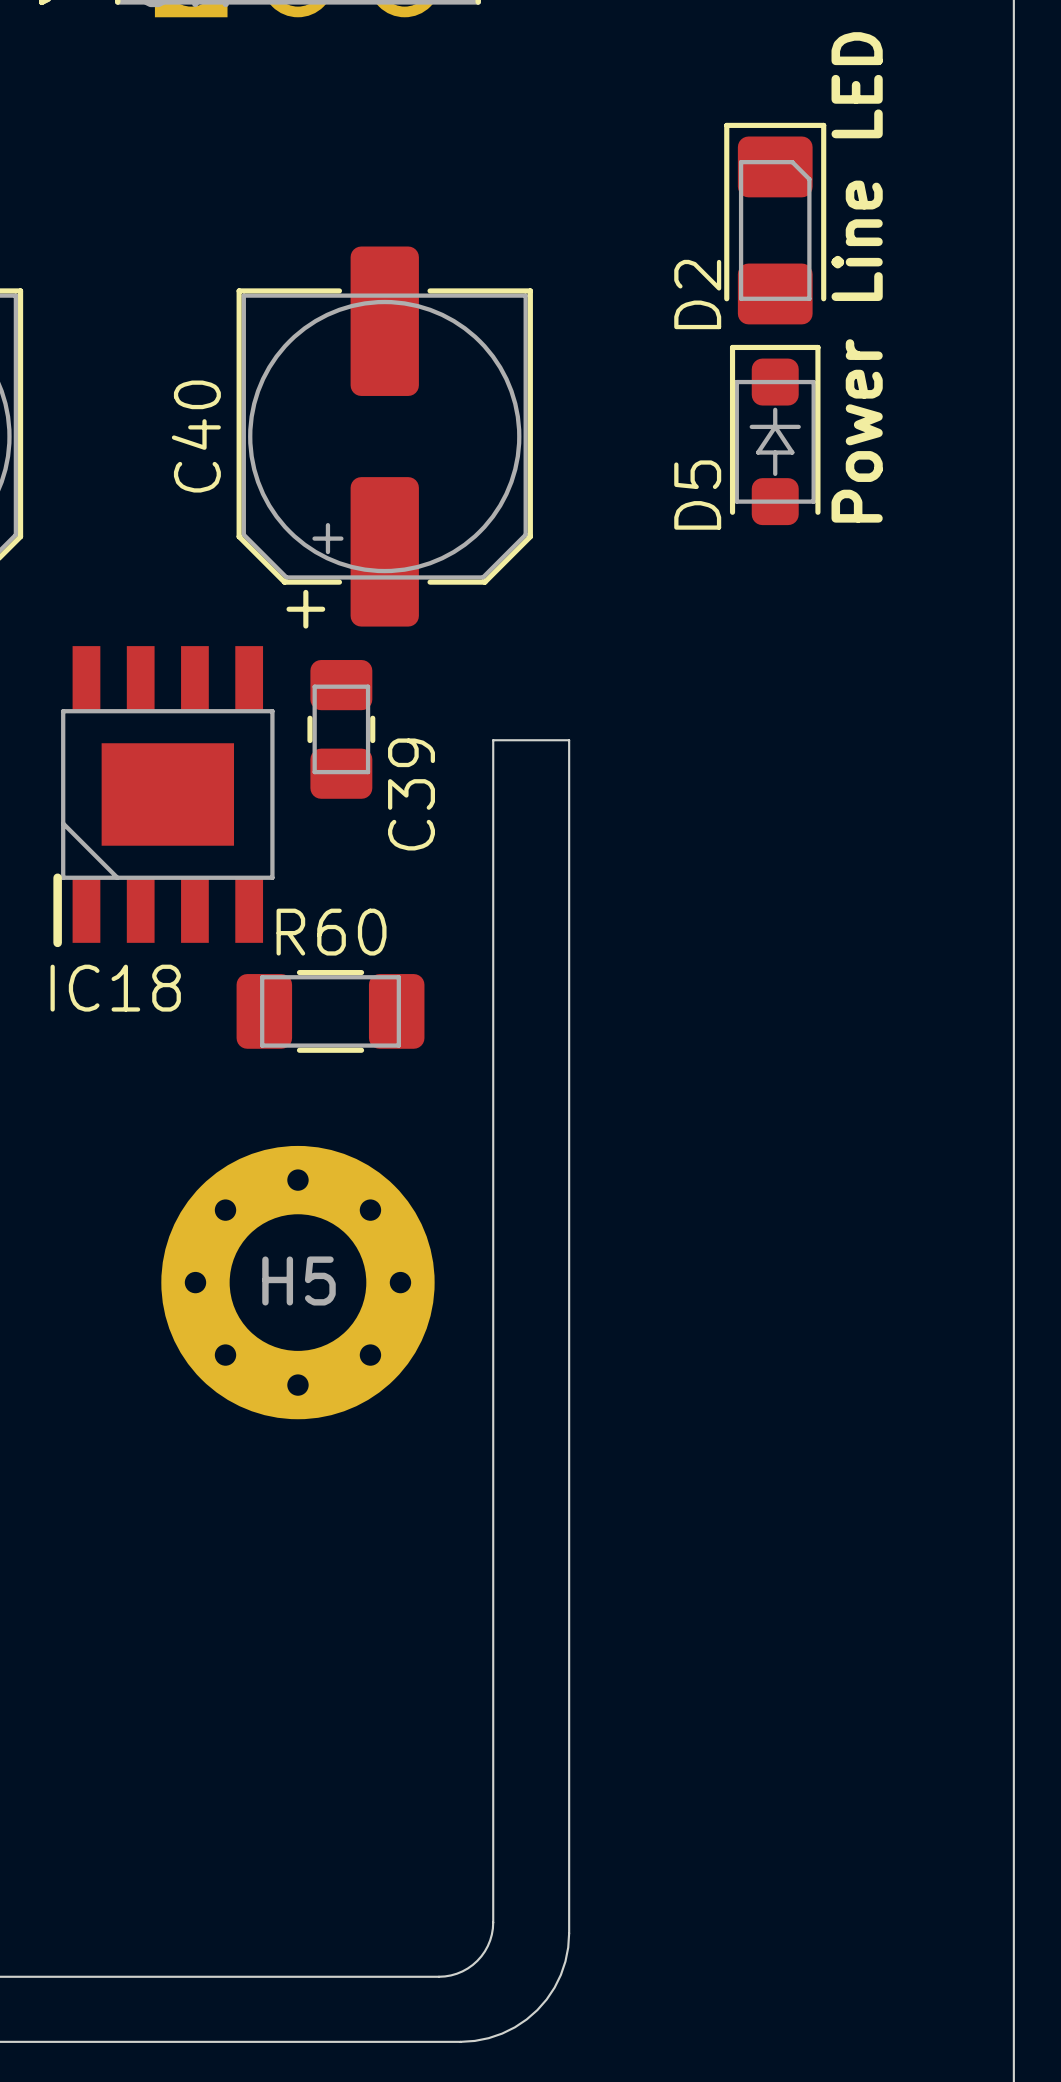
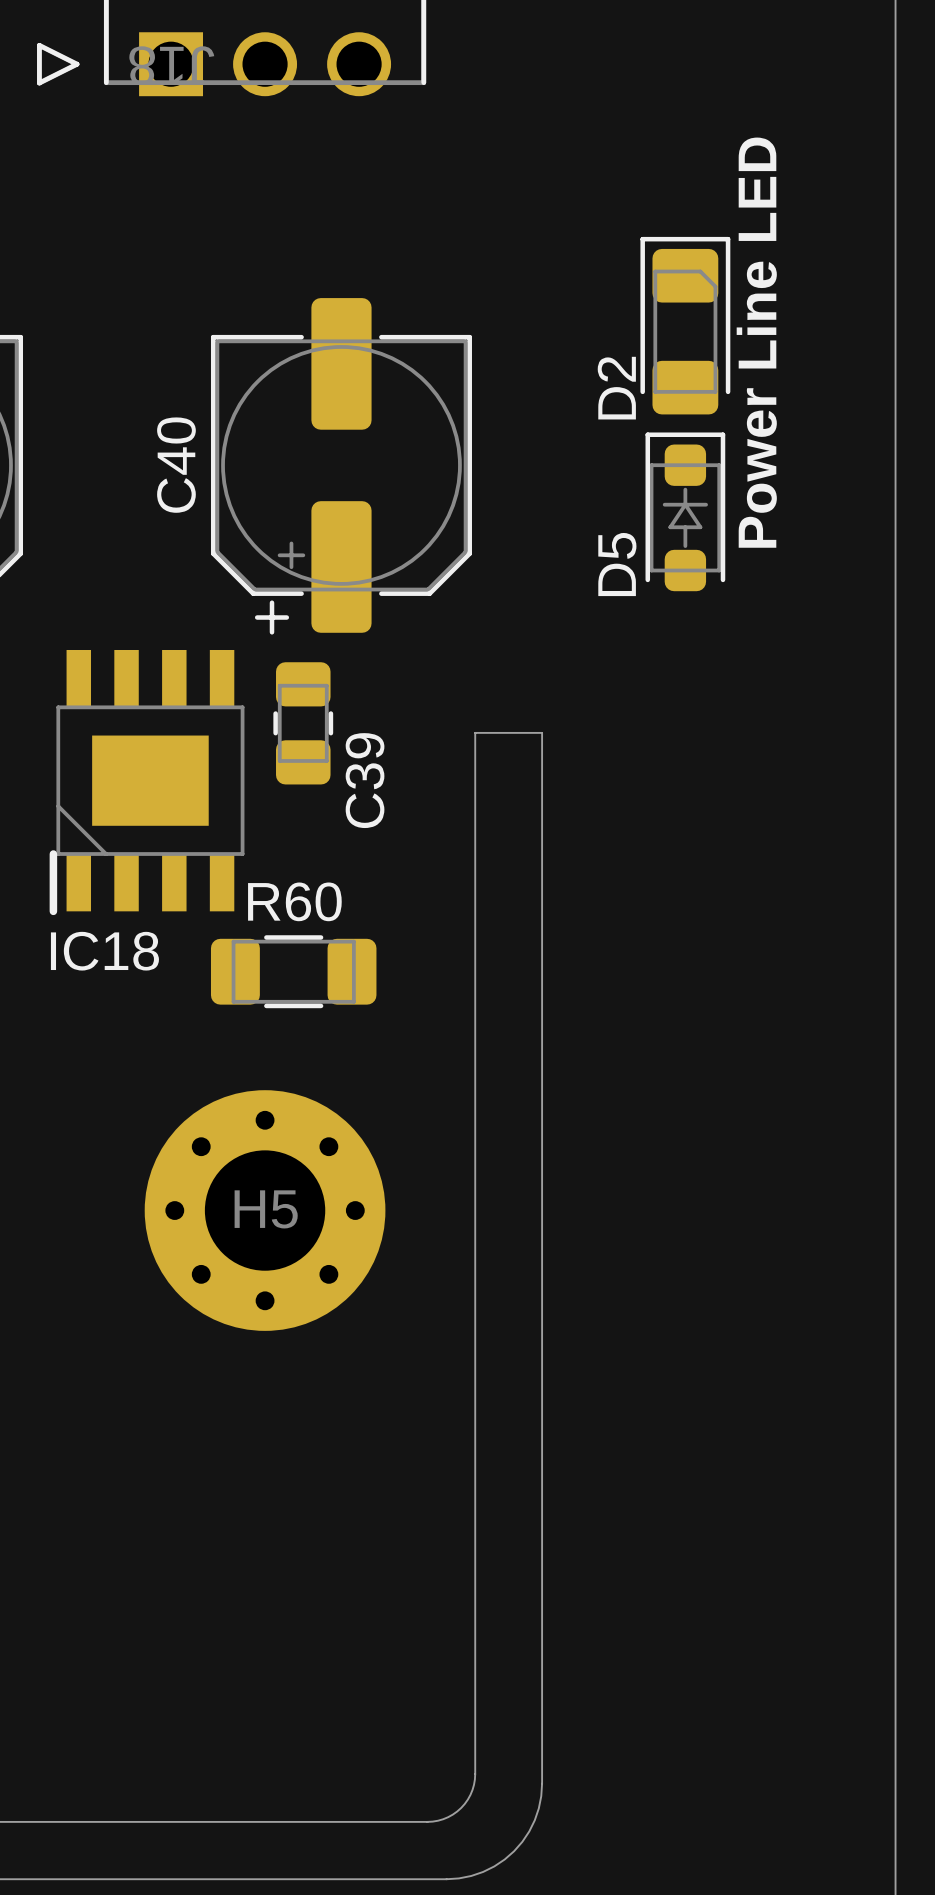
D2 position: (775, 223) -> (685, 325)
D5 position: (775, 435) -> (685, 511)
board edge: (536, 740) (493, 740) (492, 1928) (487, 1946) (477, 1960) (462, 1971) (438, 1976) -> (475, 732) (474, 1779) (470, 1794) (464, 1803) (448, 1817) (432, 1821) (389, 1821)
board edge: (569, 740) (568, 1947) (560, 1974) (554, 1987) (546, 1999) (526, 2019) (502, 2033) (488, 2038) (460, 2041) -> (503, 732) (542, 732) (541, 1796) (534, 1820) (522, 1841) (504, 1859) (494, 1866) (483, 1871) (459, 1878) (408, 1879)

